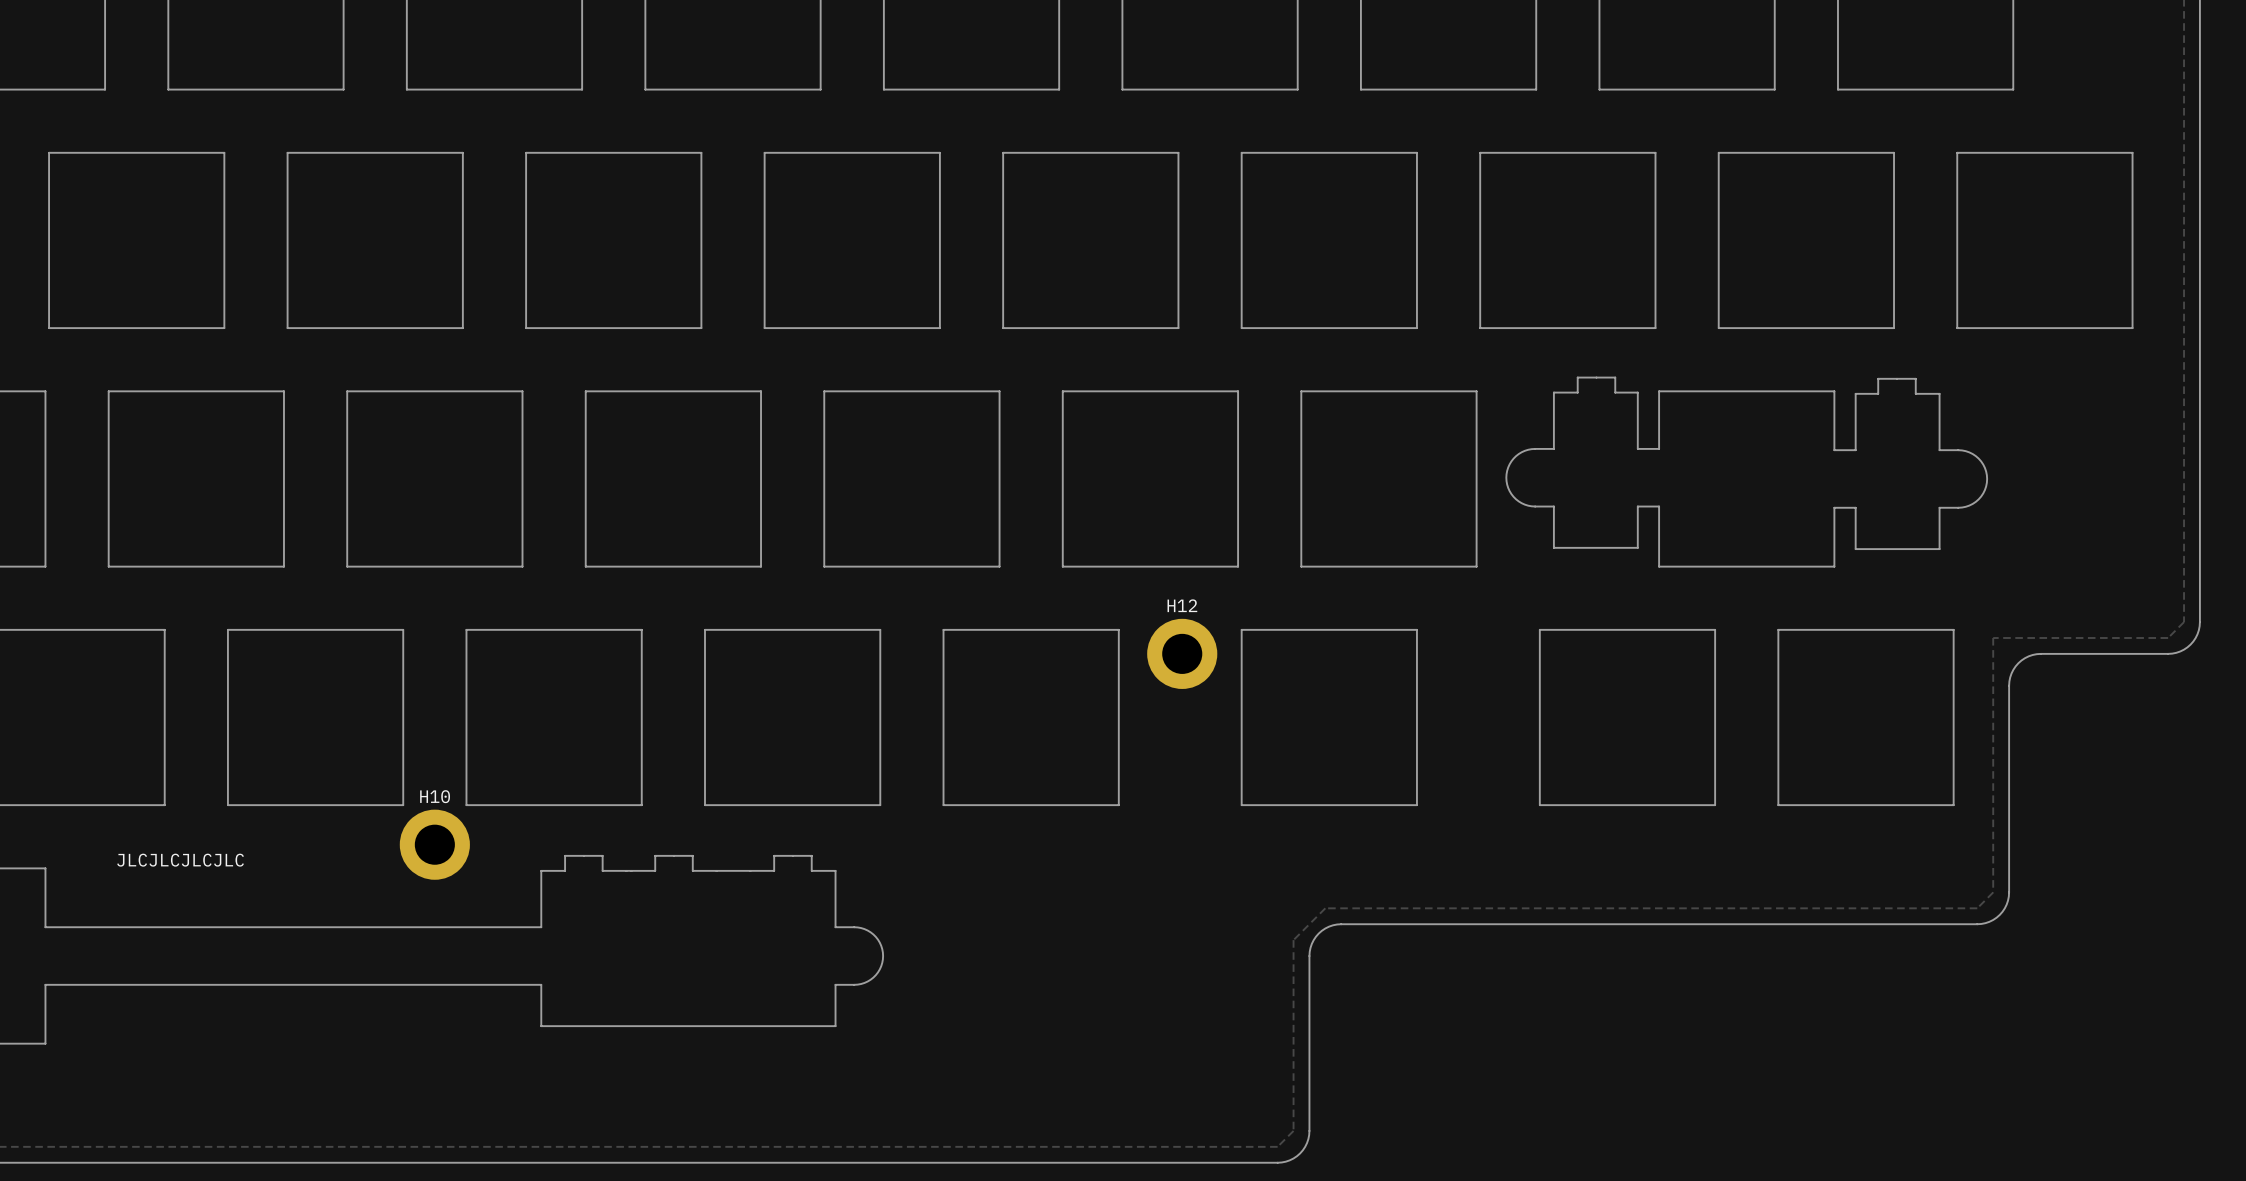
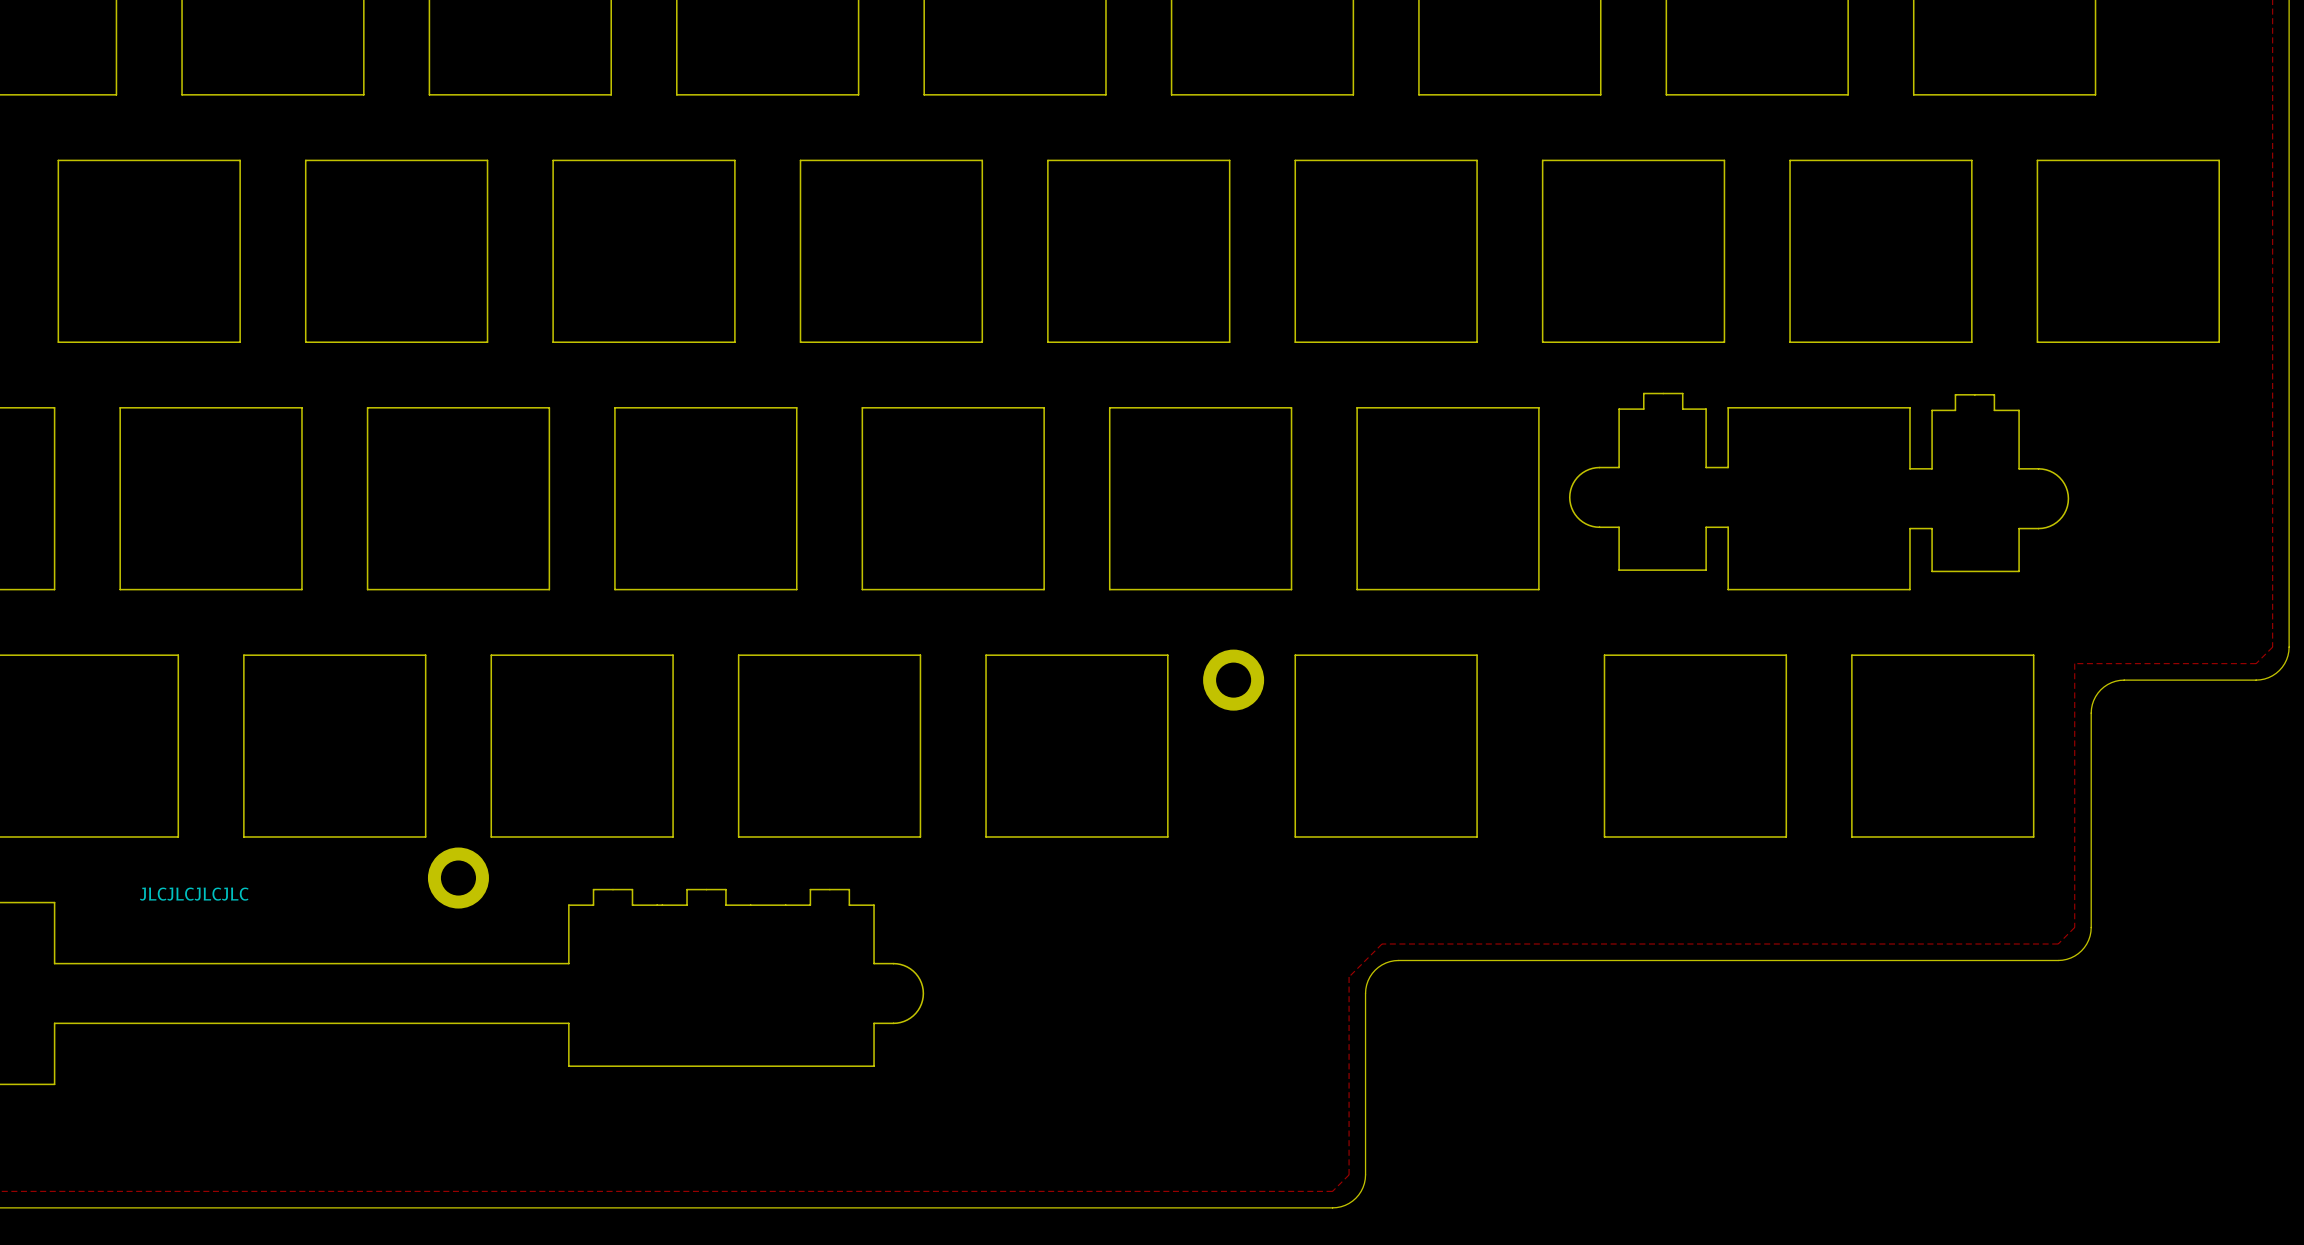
H12: (1182, 653) -> none
part: none -> (1233, 680)
H10: (434, 844) -> none
part: none -> (458, 878)

